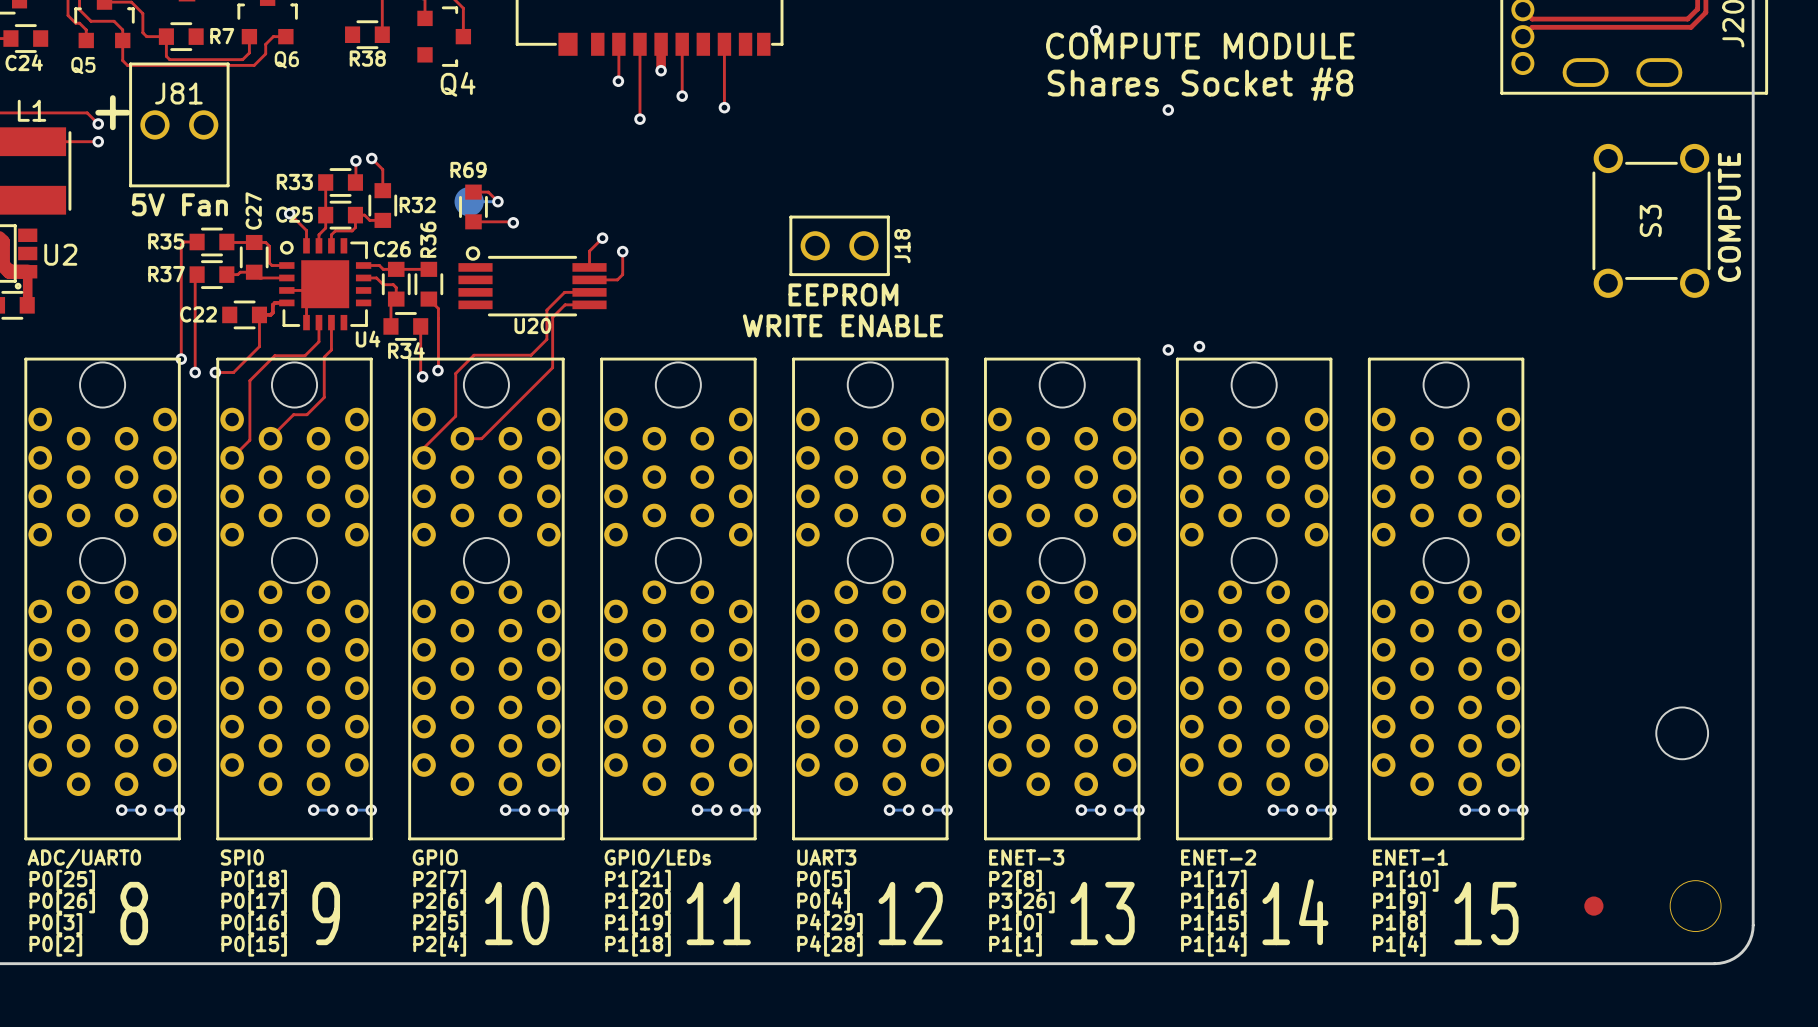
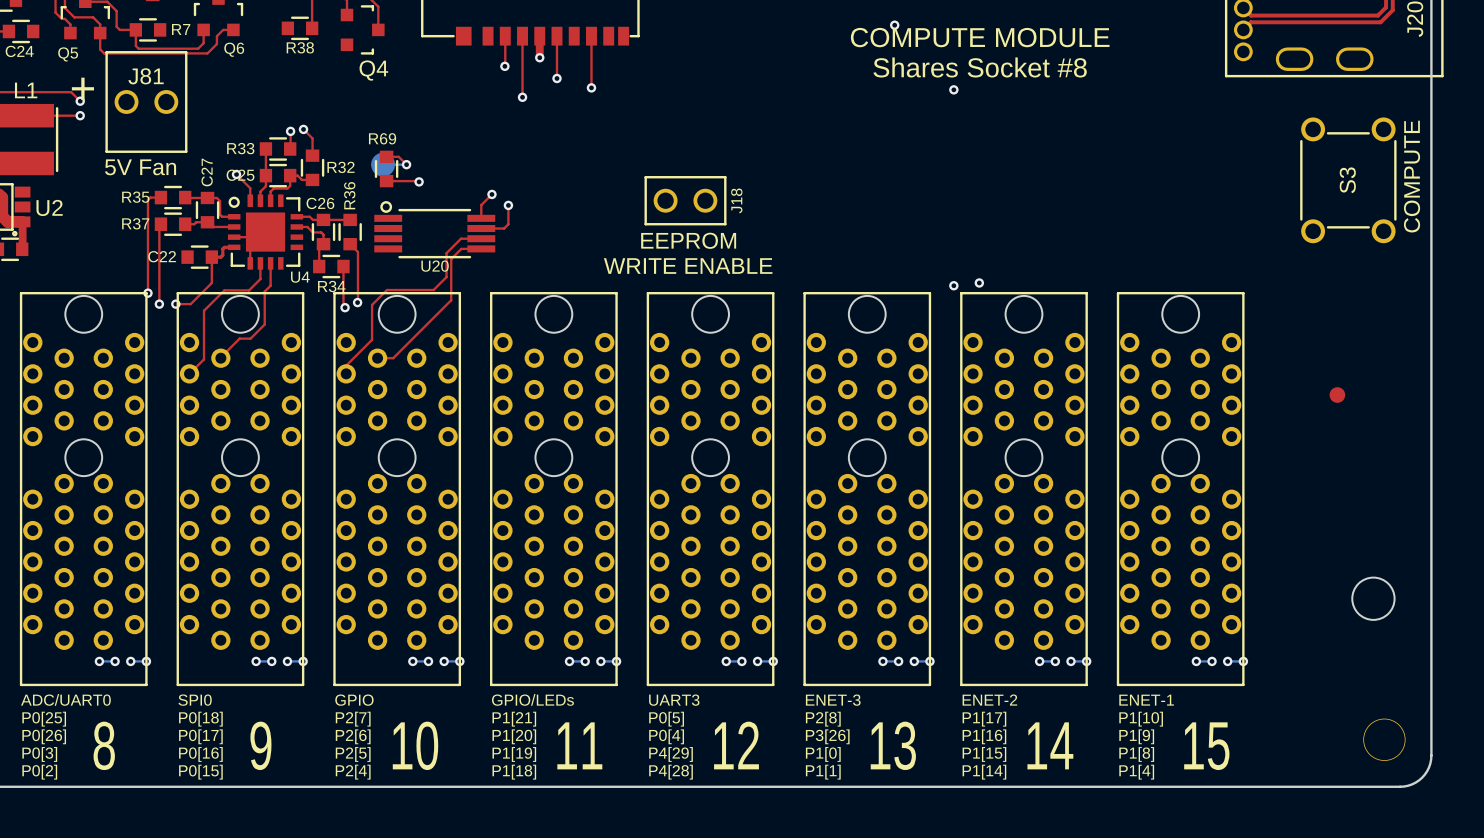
part position: (1593, 906) -> (1337, 395)

